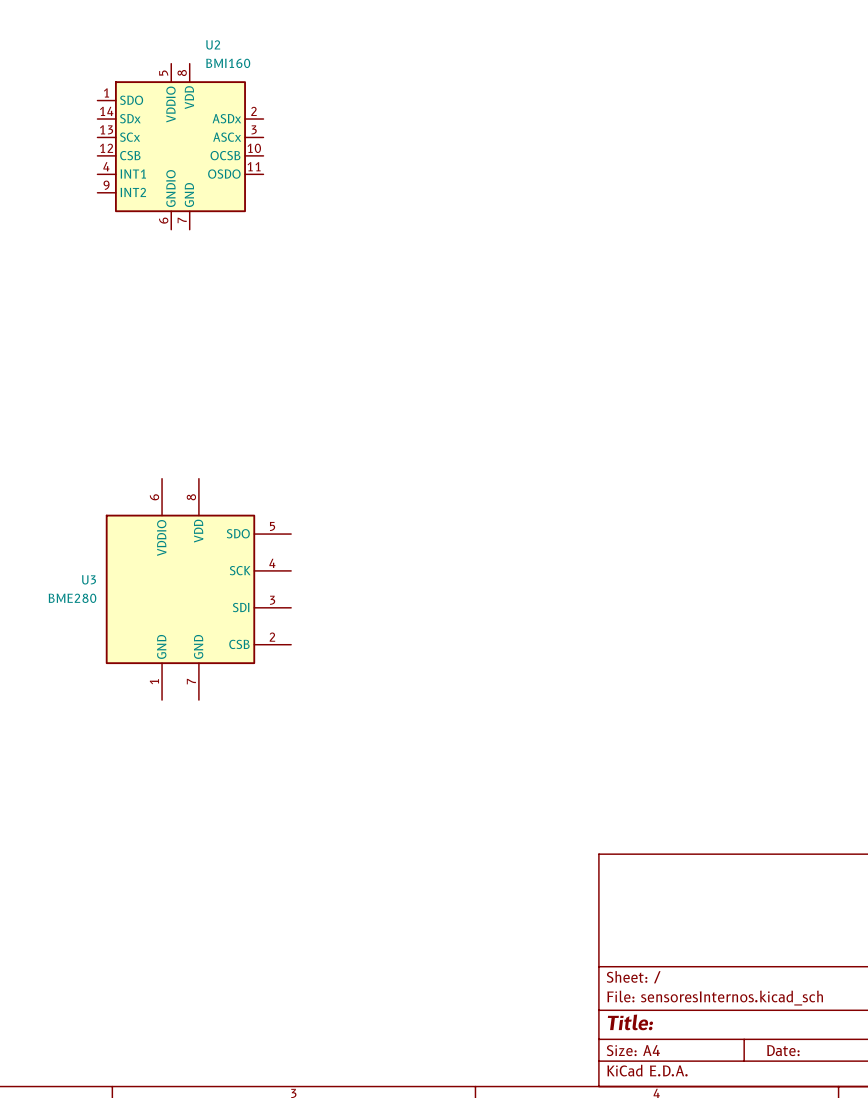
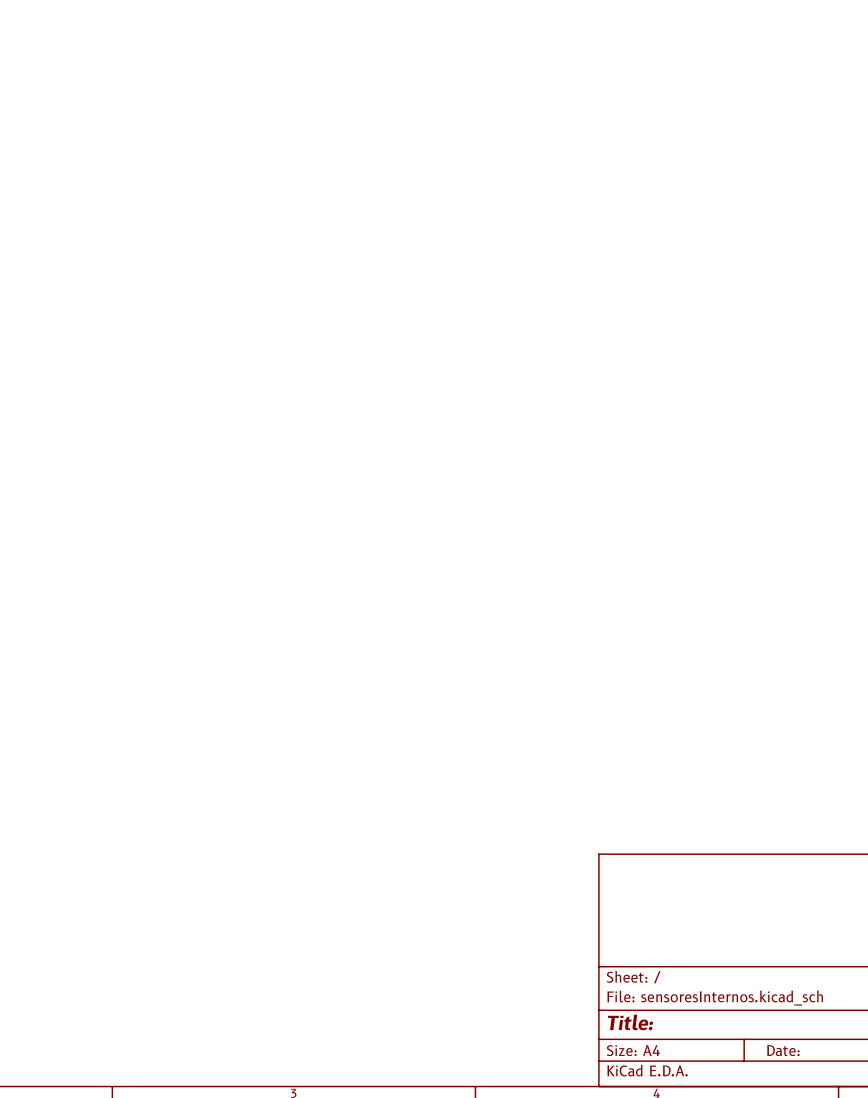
U2: BMI160 (180, 146) -> none
U3: BME280 (198, 589) -> none

